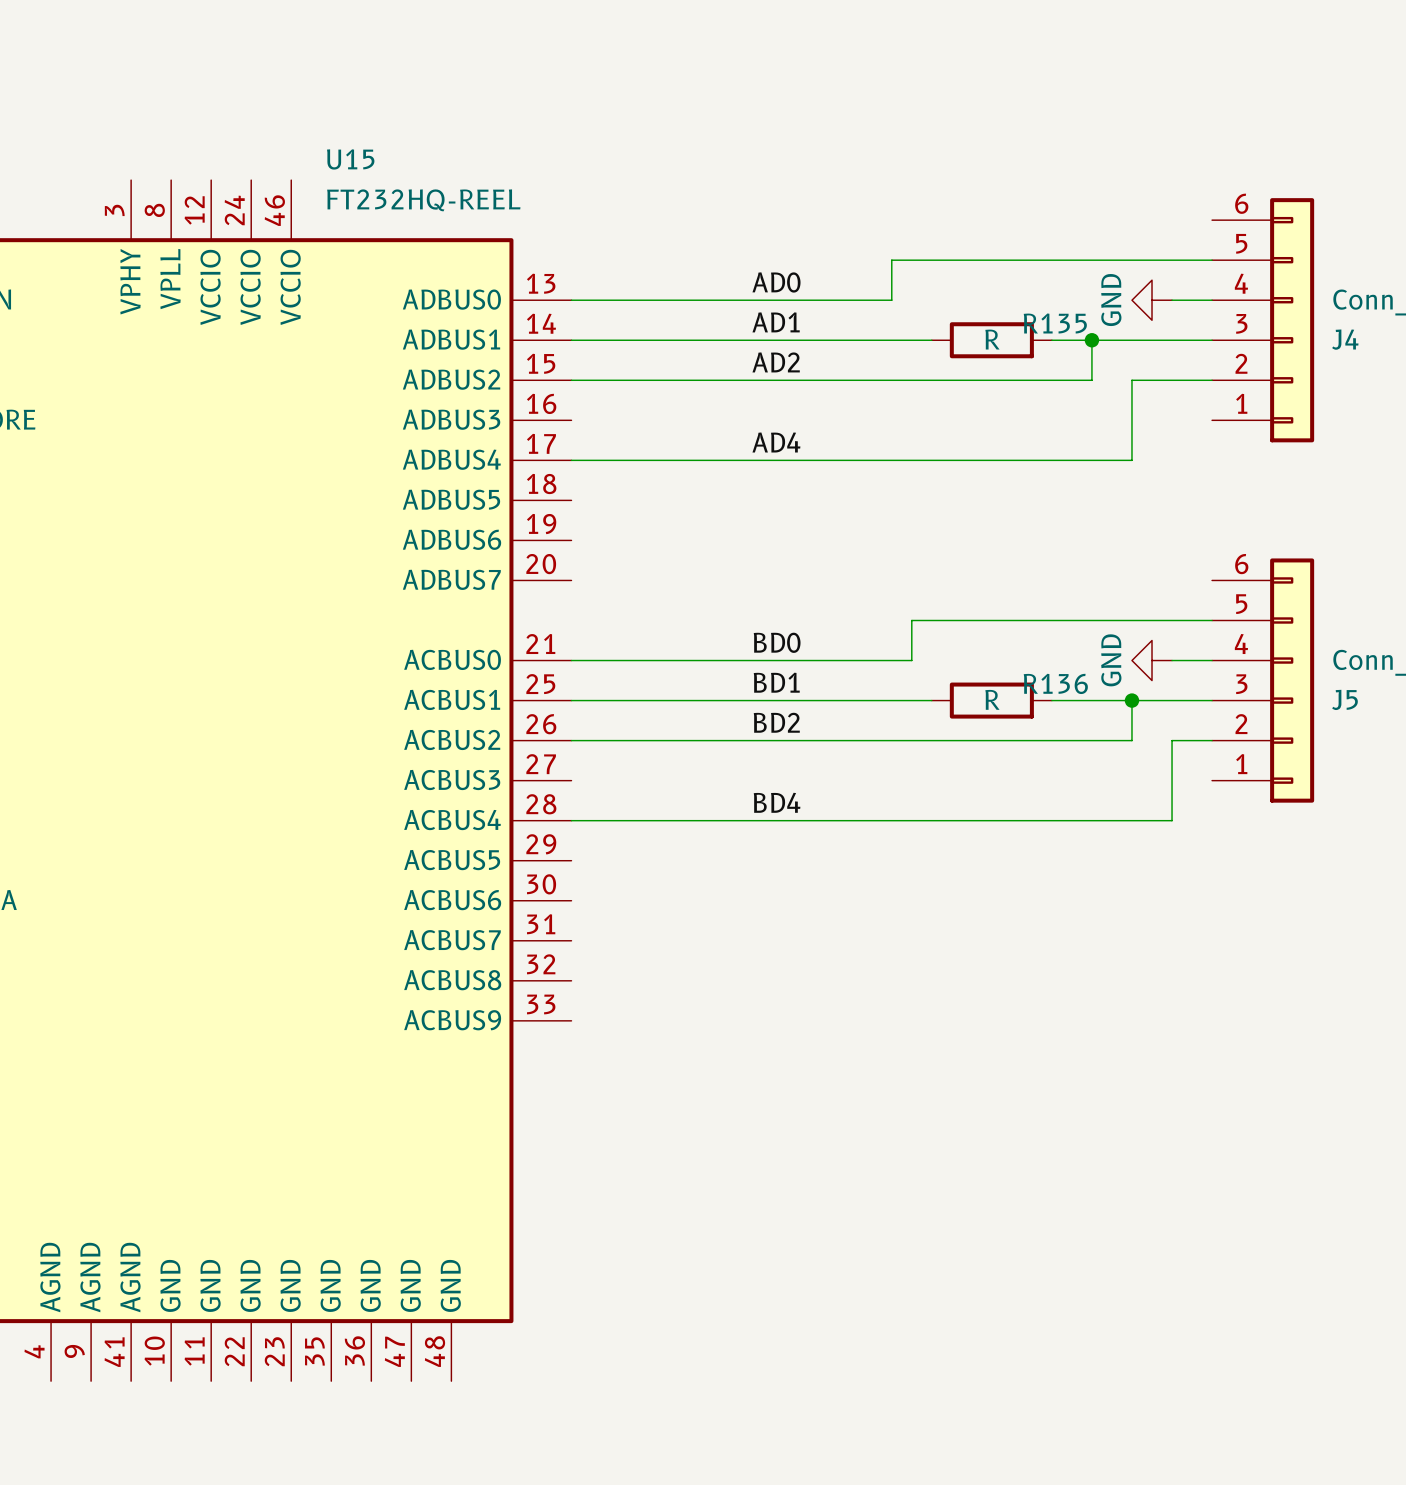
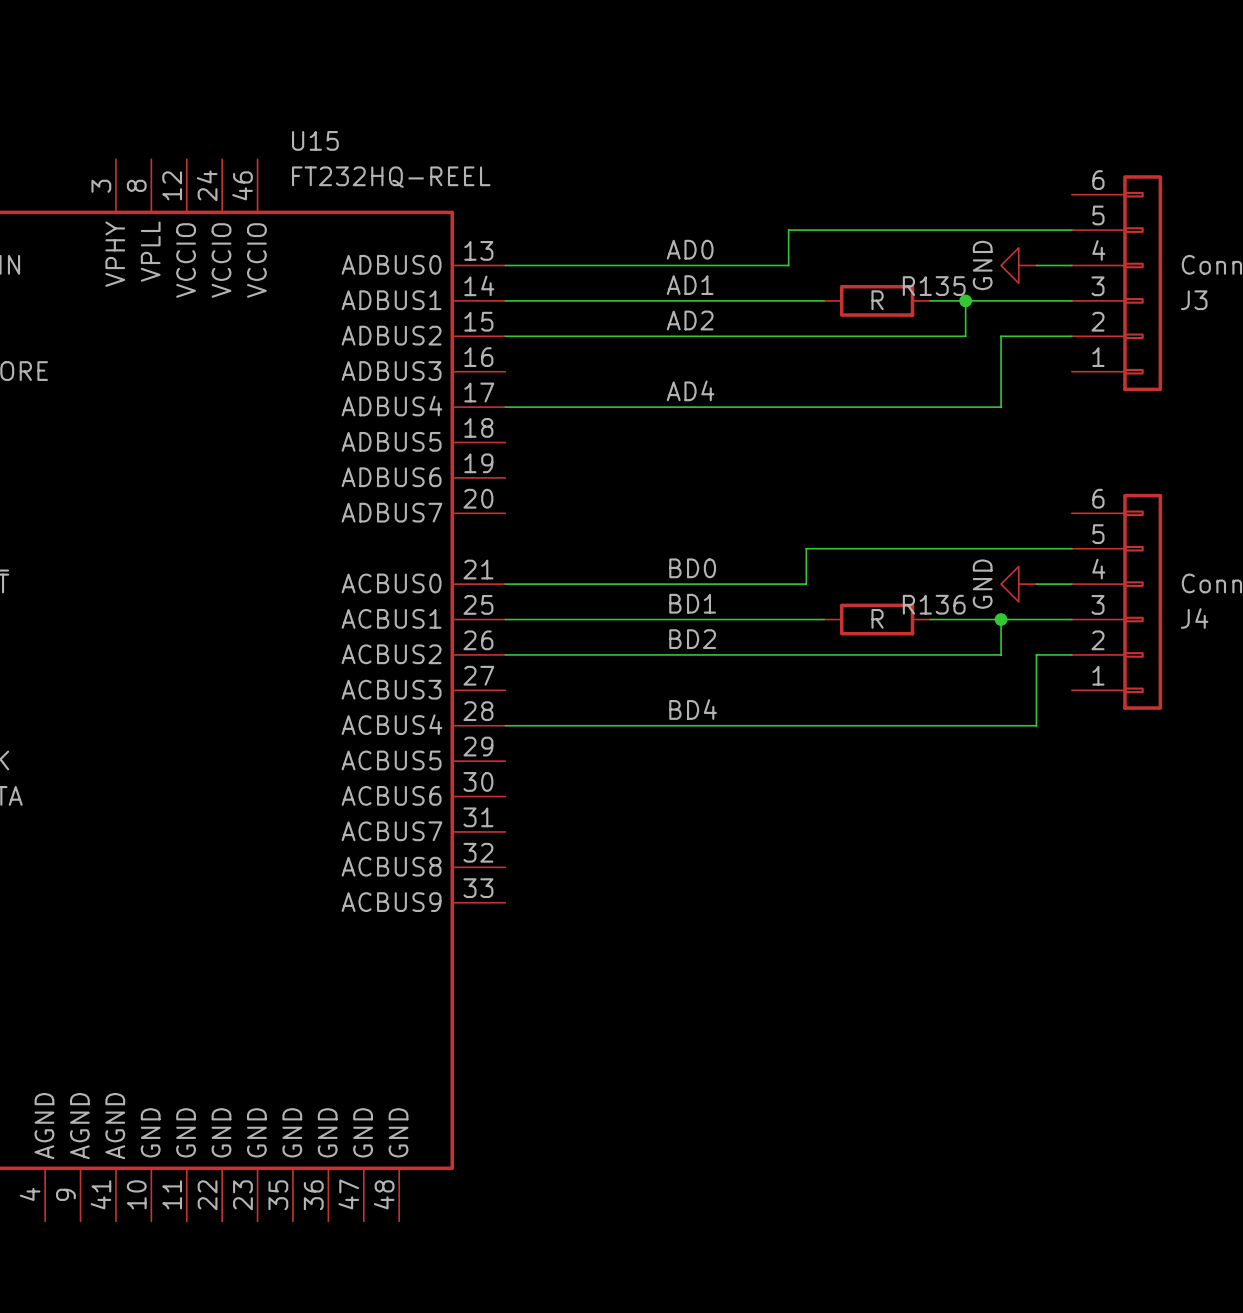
J4 name: J4 (1345, 339) -> J3 (1194, 300)
J5 name: J5 (1344, 699) -> J4 (1194, 618)

